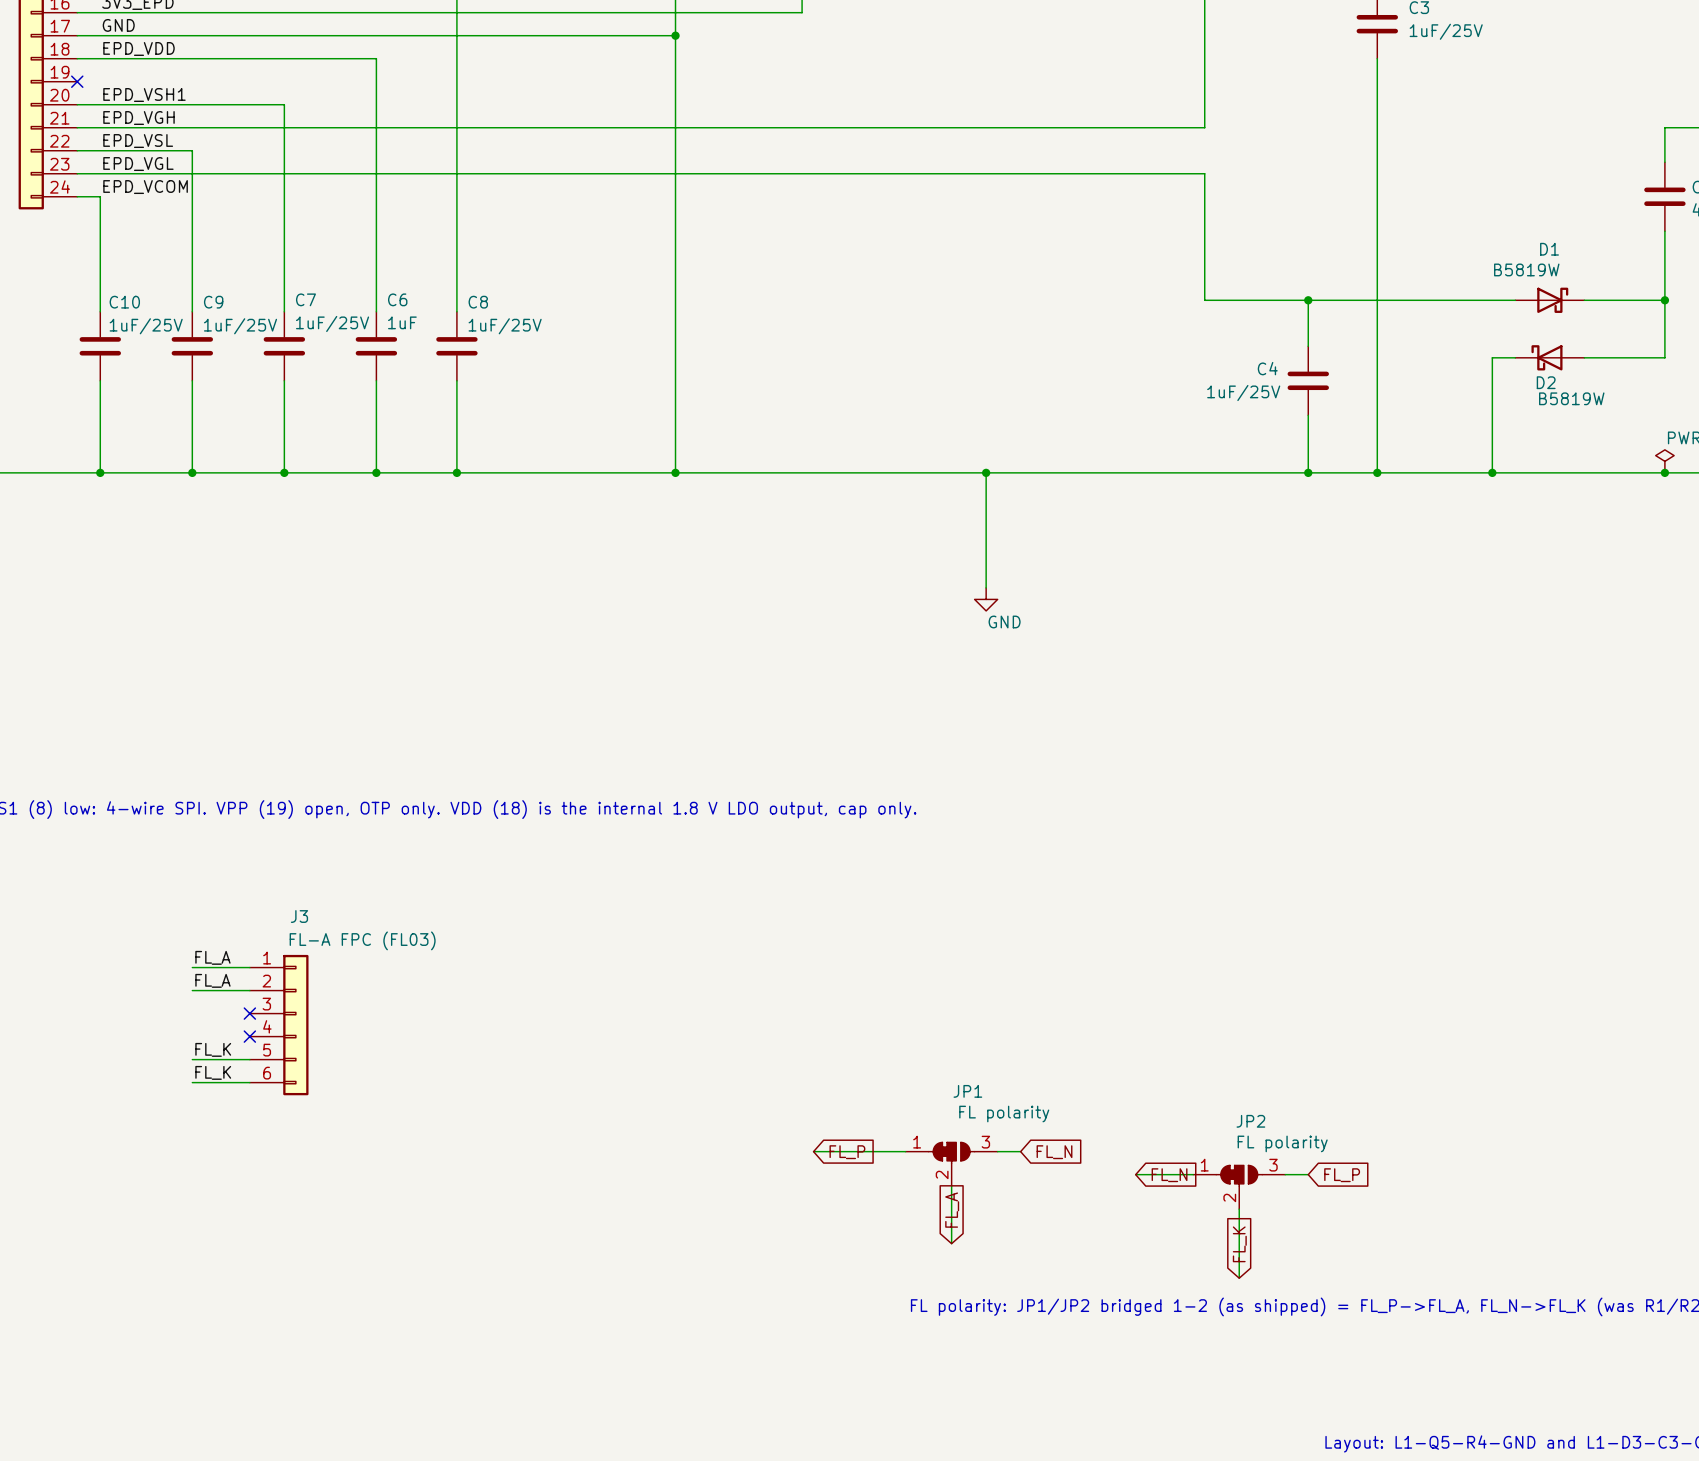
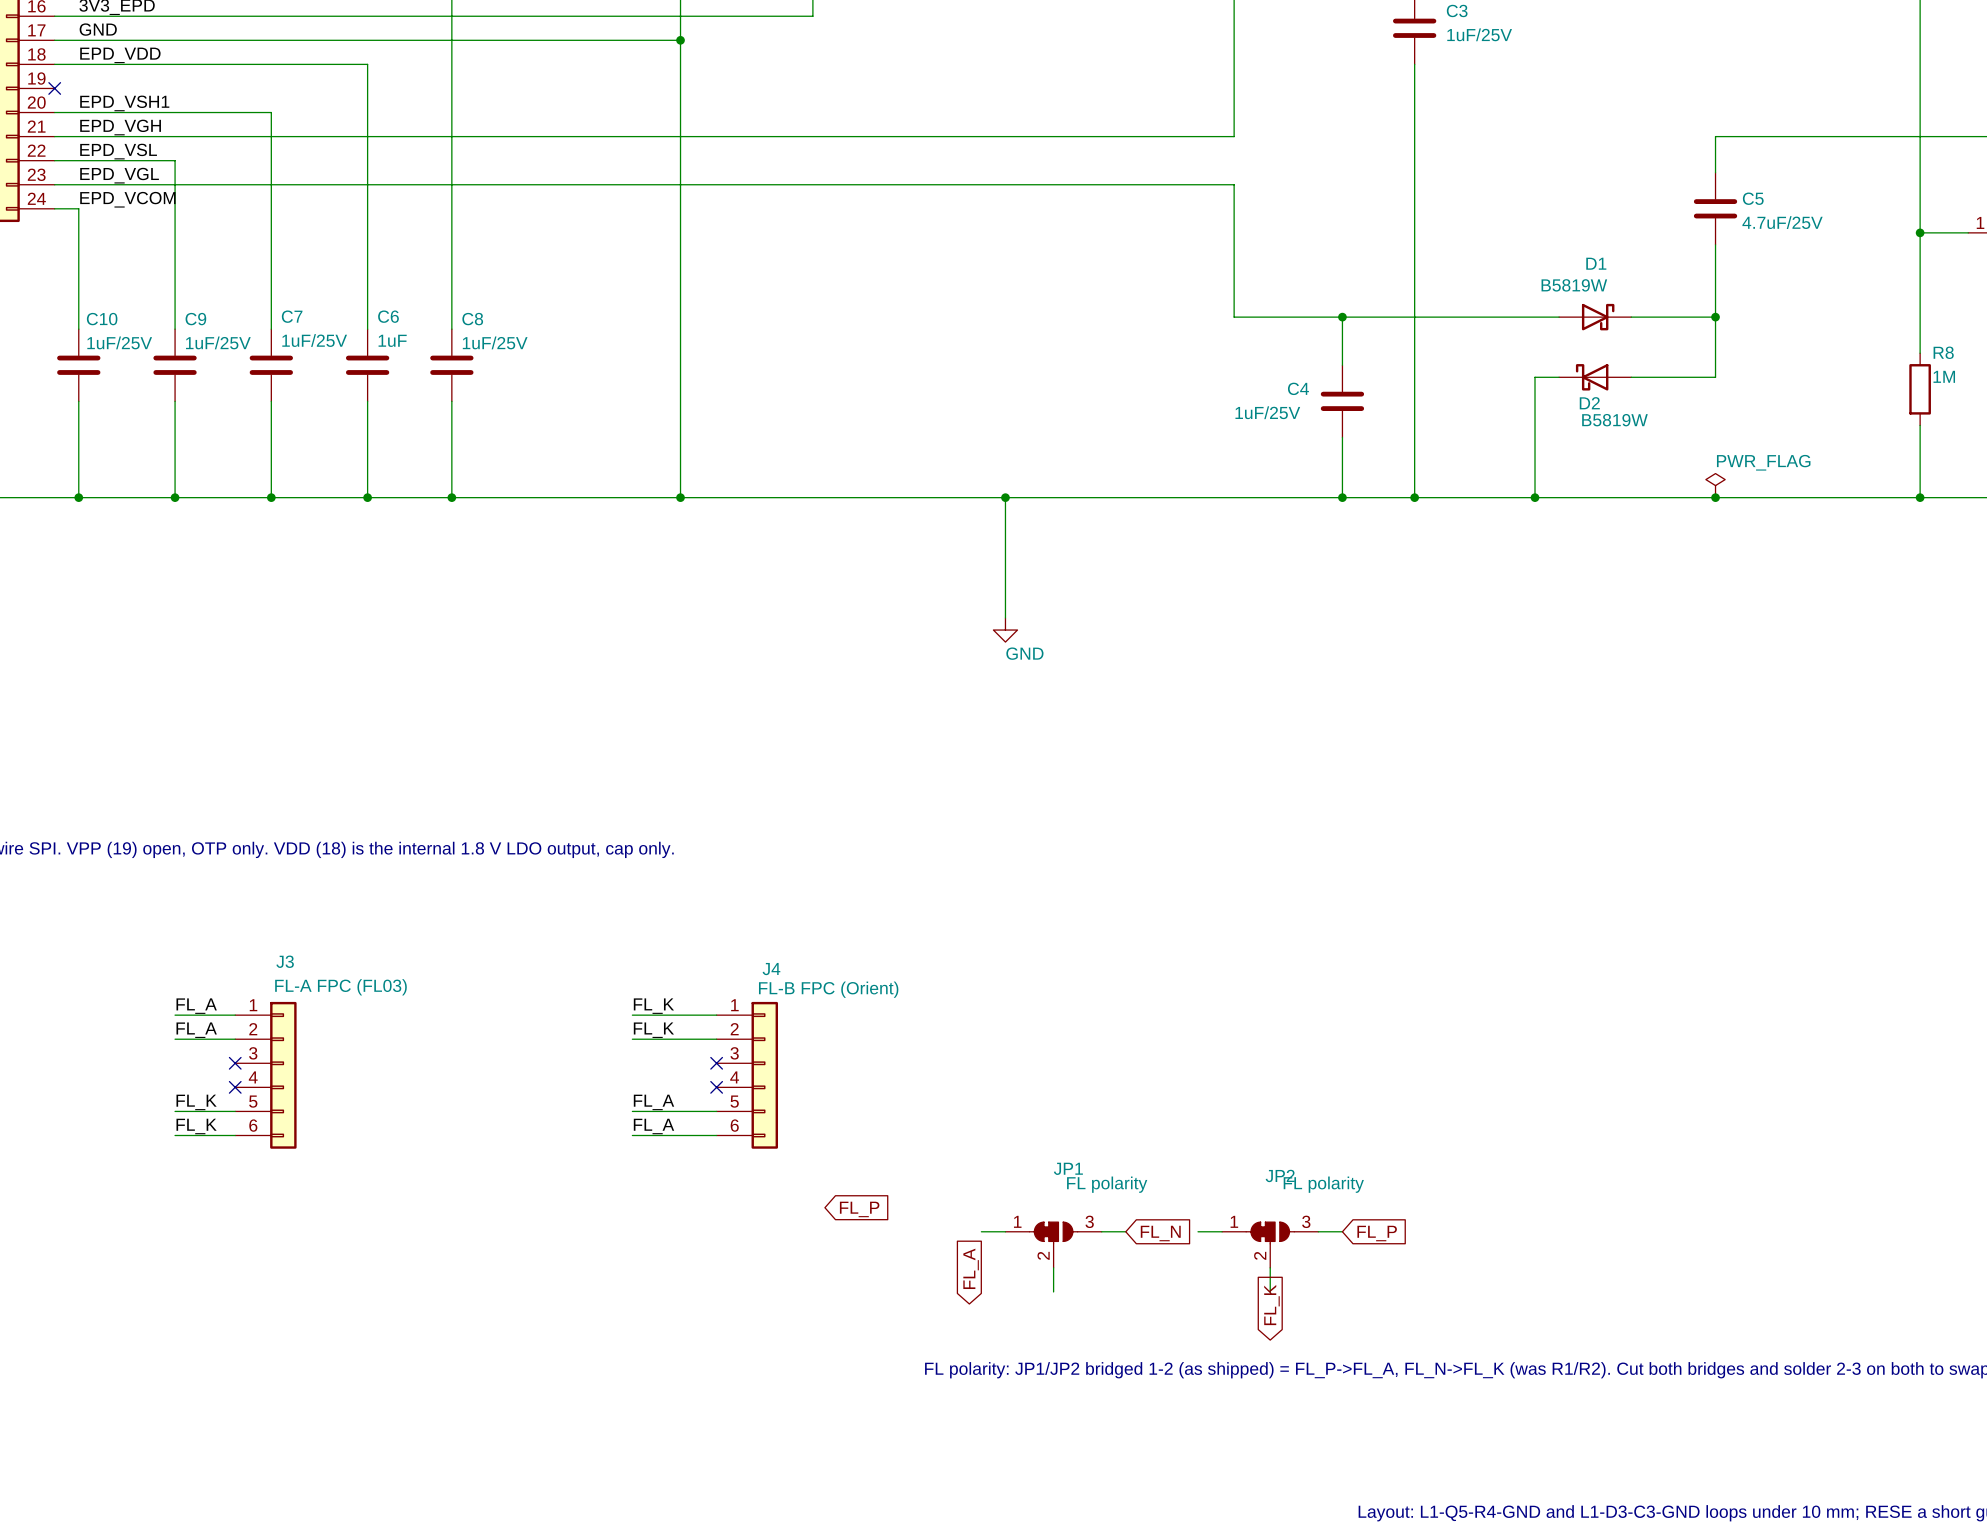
label: none -> FL_K (653, 1006)
wire: none -> (632, 1015) (716, 1015)
label: none -> FL_K (653, 1030)
wire: none -> (632, 1039) (716, 1039)
no-connect mark: none -> (716, 1063)
J4: none -> FL-B FPC (Orient) (747, 1075)
no-connect mark: none -> (716, 1087)
label: none -> FL_A (653, 1102)
wire: none -> (632, 1111) (716, 1111)
label: none -> FL_A (653, 1126)
wire: none -> (632, 1135) (716, 1135)
JP1 value position: FL polarity (1004, 1114) -> FL polarity (1107, 1184)
JP2 value position: FL polarity (1282, 1143) -> FL polarity (1323, 1184)
wire: (813, 1151) (905, 1151) -> none
wire: (997, 1151) (1020, 1151) -> (981, 1231) (1005, 1231)
global label: FL_N (1054, 1152) -> none
JP1 position: (951, 1164) -> (1053, 1245)
wire: none -> (1101, 1231) (1125, 1231)
wire: (1135, 1174) (1170, 1174) -> none
global label position: FL_N (1169, 1175) -> FL_N (1160, 1233)
wire: (951, 1186) (951, 1243) -> none
wire: none -> (1053, 1267) (1053, 1291)
wire: (1239, 1232) (1239, 1278) -> none

